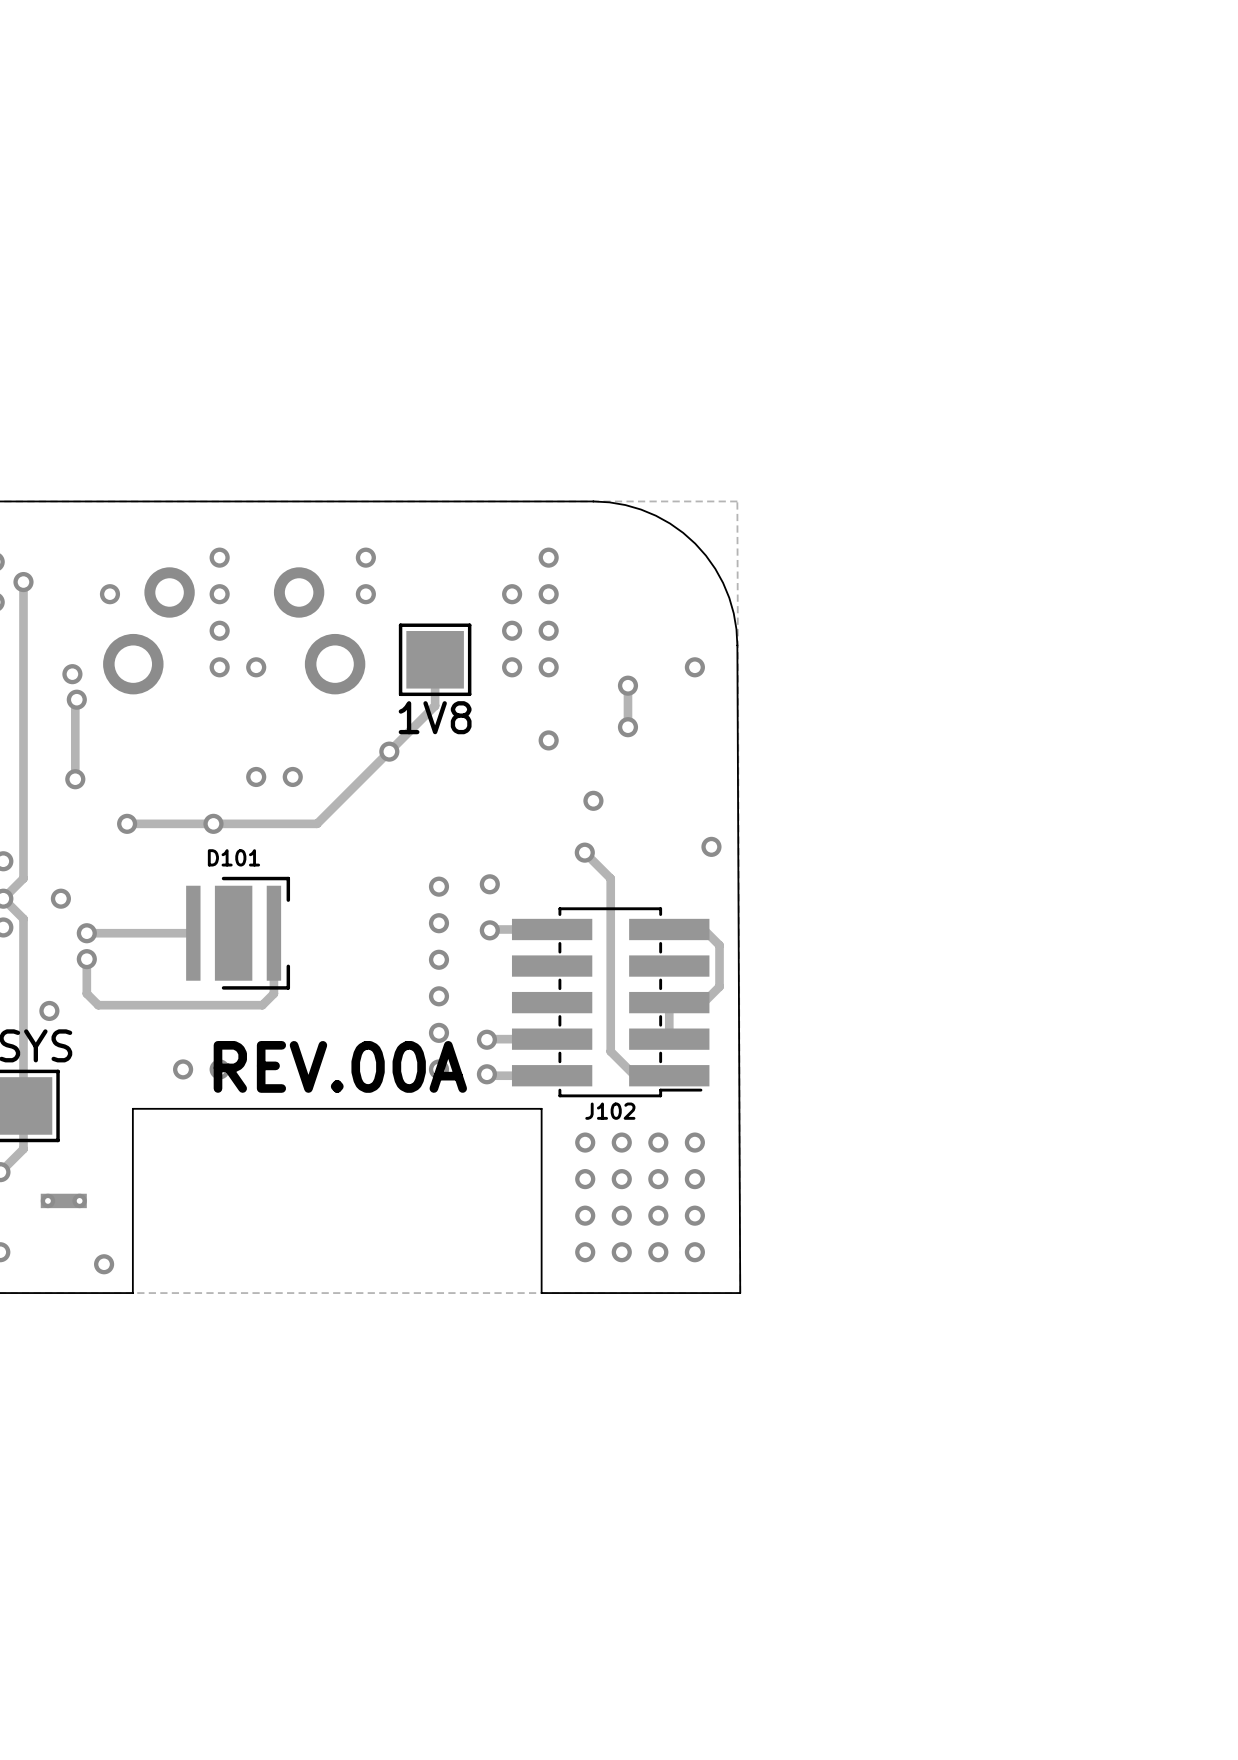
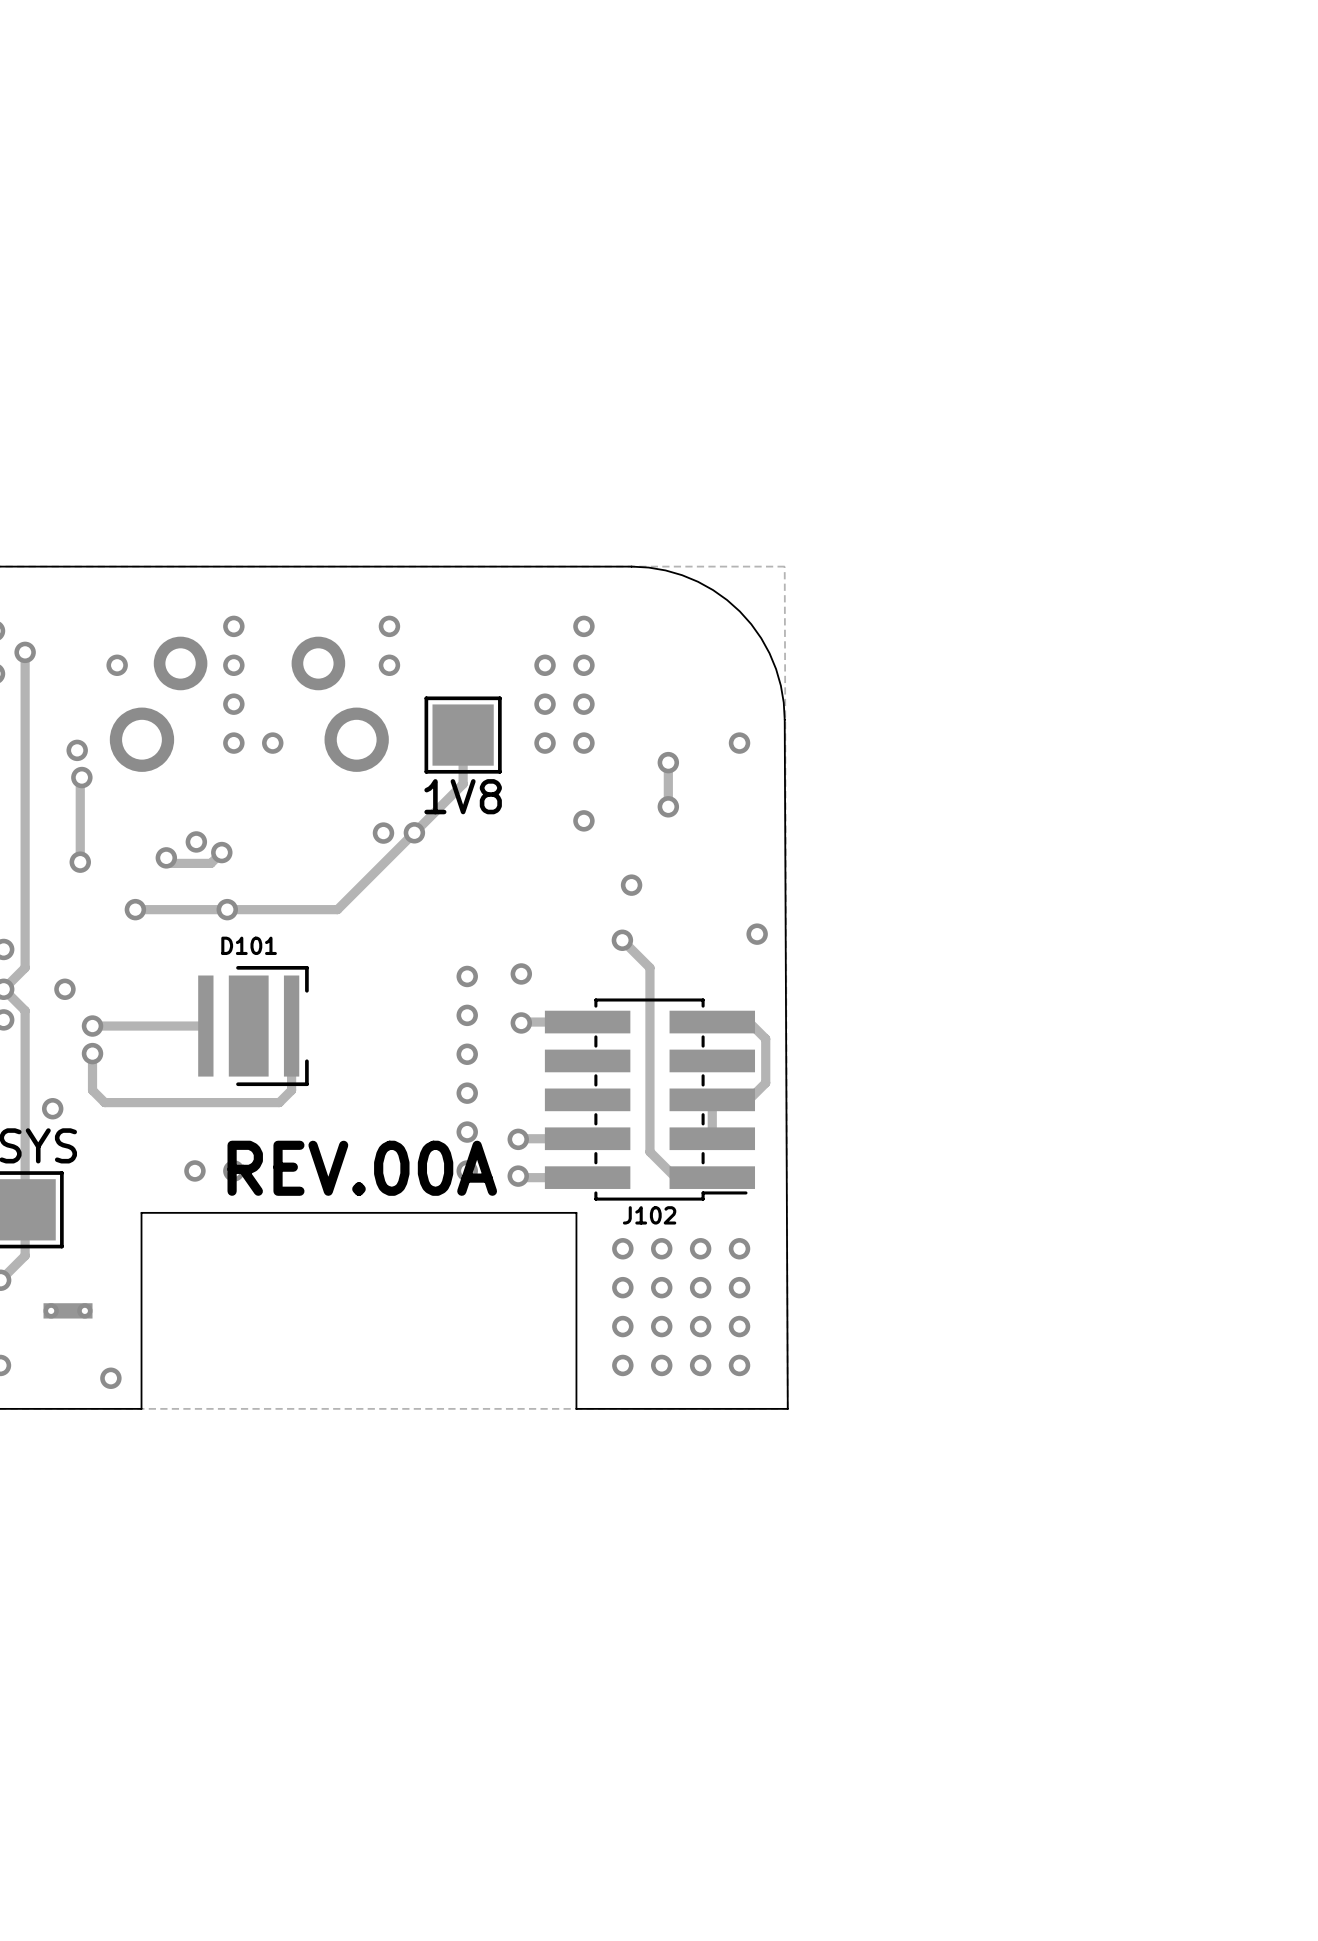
via: none -> (383, 833)
via: none -> (196, 841)
track: none -> (221, 852) (210, 863) (171, 863) (166, 857)
via: none -> (221, 852)
via: none -> (166, 857)
via: (256, 776) -> none
via: (292, 776) -> none

